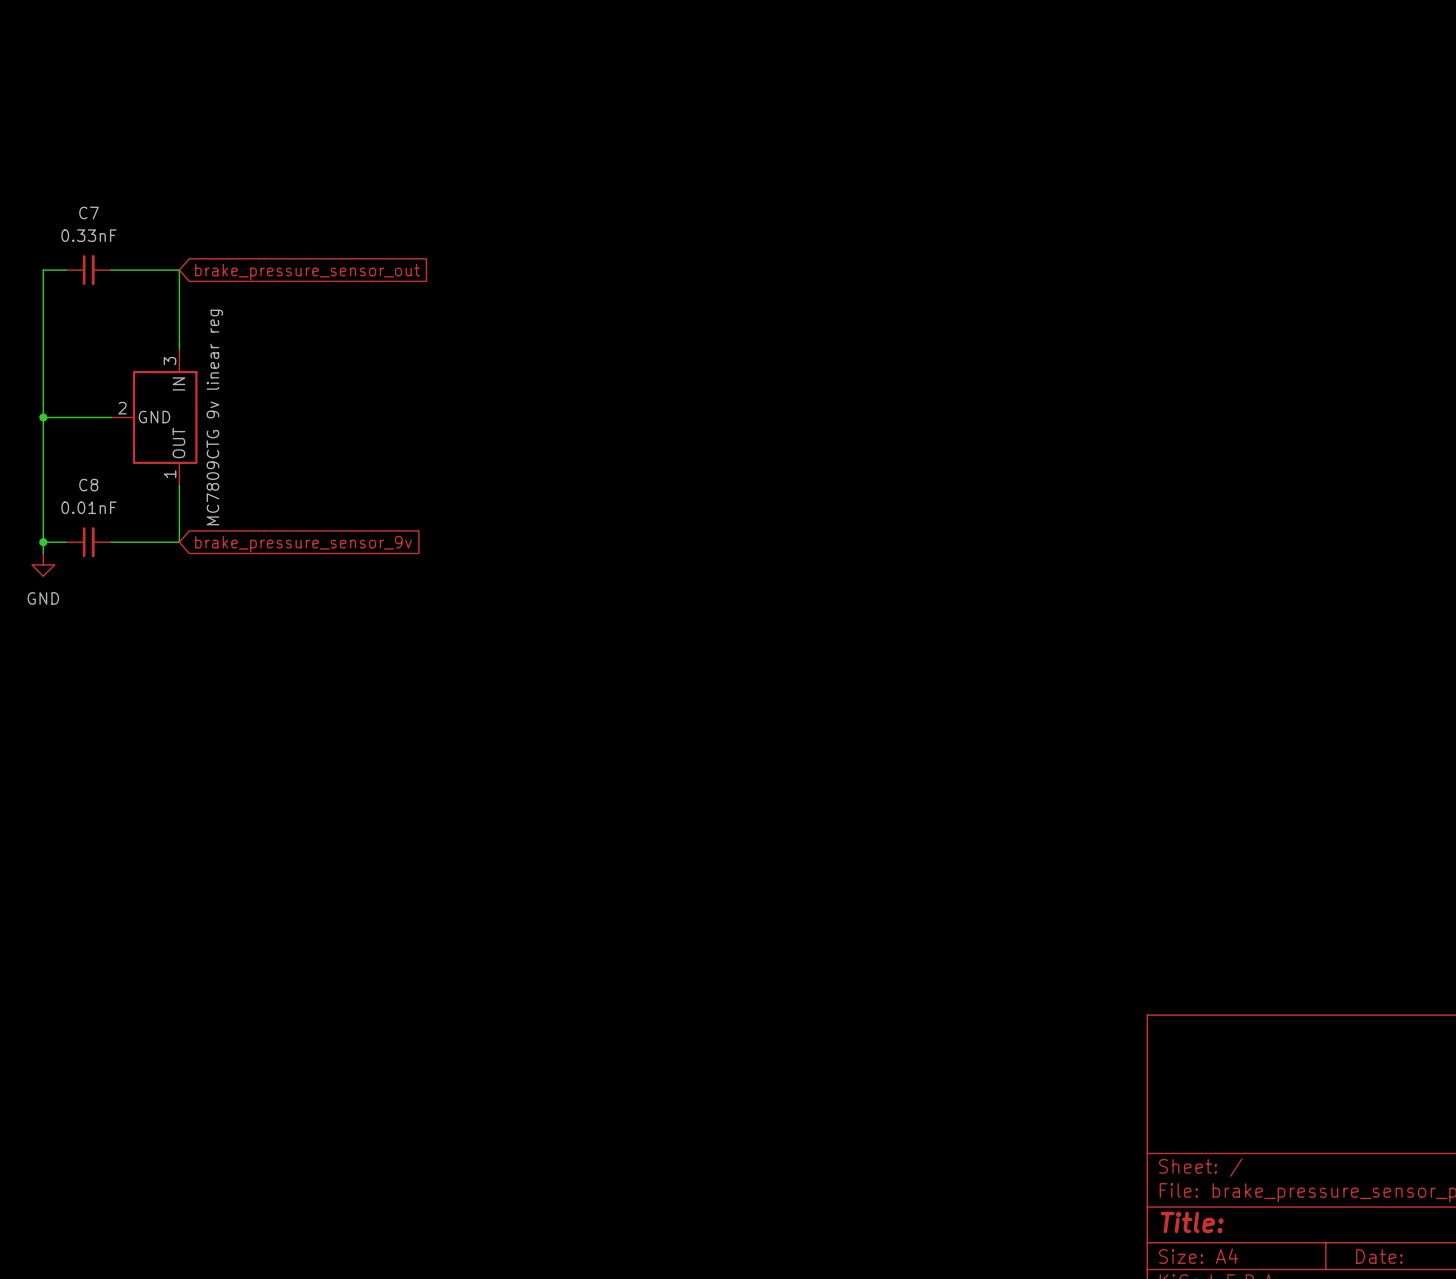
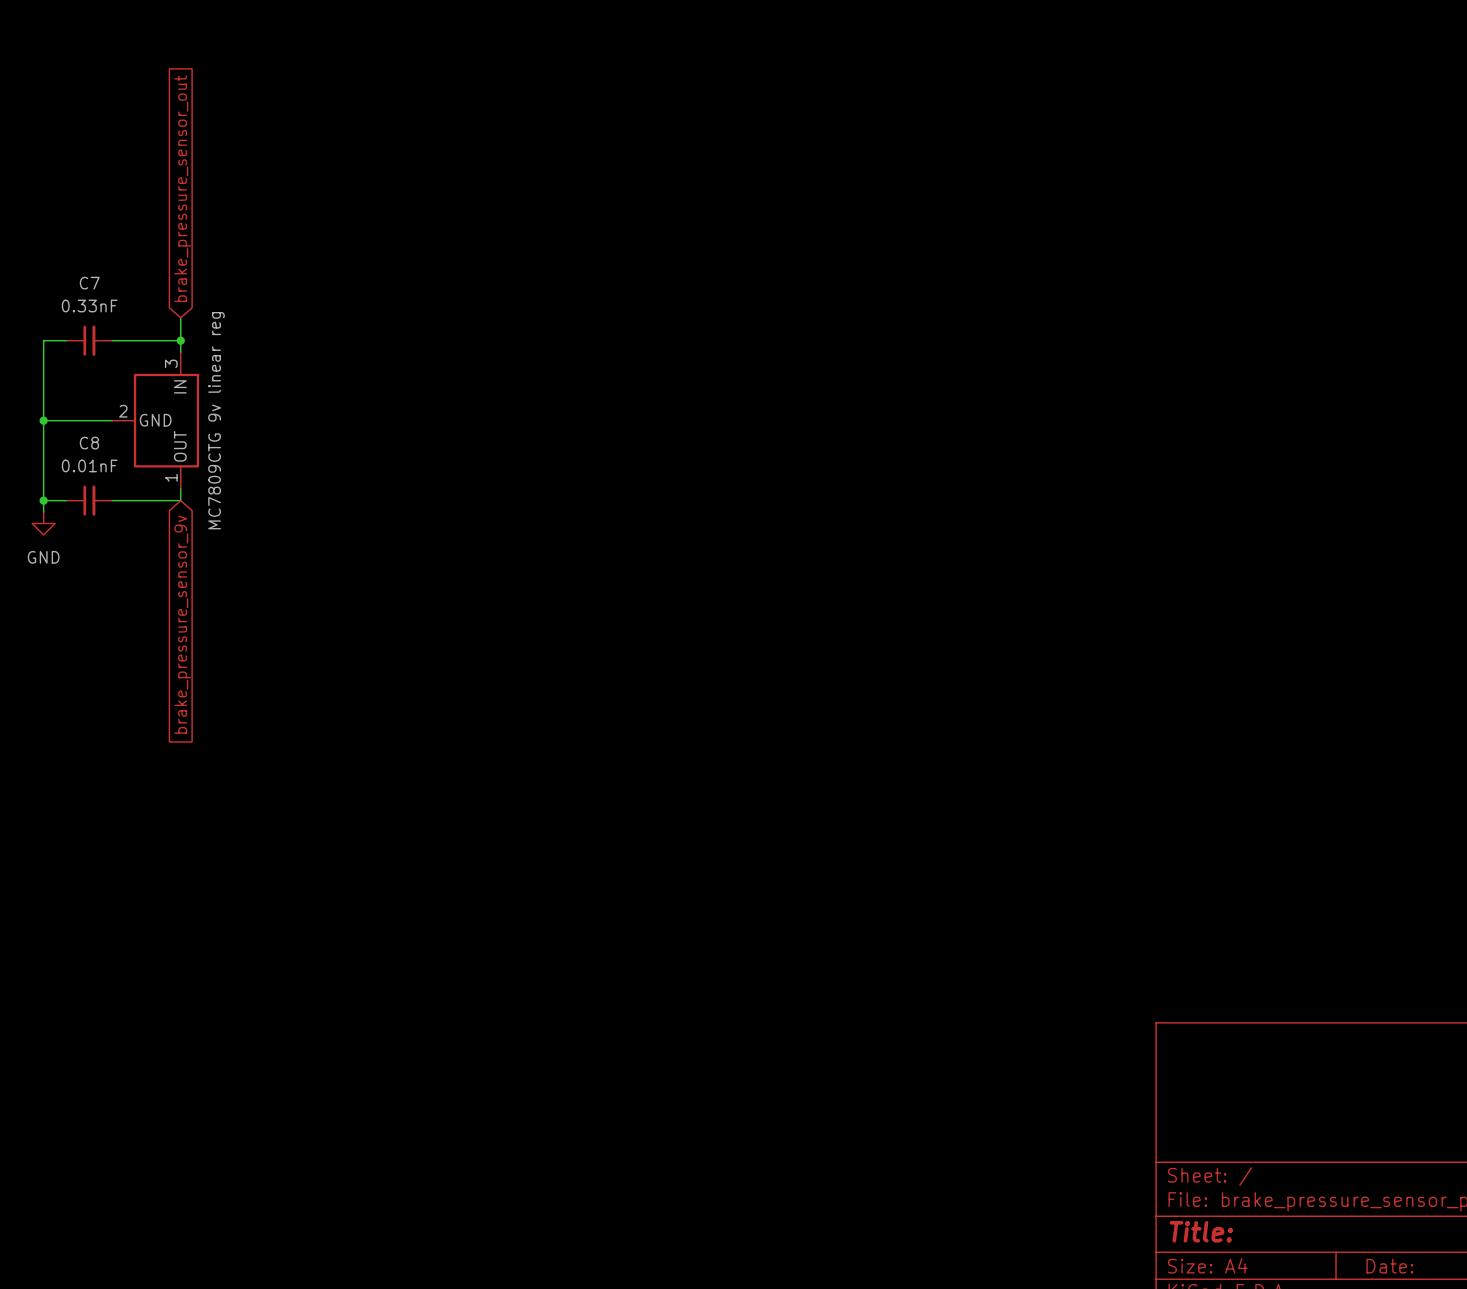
wire: (66, 270) (43, 270) (43, 338) -> (66, 340) (43, 340)
C7 position: (88, 270) -> (89, 340)
wire: (111, 270) (179, 270) (179, 315) -> none
global label rotation: 0° (307, 271) -> 90° counterclockwise (182, 188)
wire: none -> (112, 340) (180, 340)
junction: none -> (180, 340)
wire: (179, 496) (179, 542) (111, 542) -> (180, 500) (112, 500)
wire: (43, 508) (43, 553) -> none
wire: (43, 542) (66, 542) -> (43, 500) (66, 500)
junction position: (43, 542) -> (43, 500)
C8 position: (88, 542) -> (89, 500)
global label rotation: 0° (303, 544) -> 90° clockwise (182, 624)
power symbol position: GND (43, 564) -> GND (43, 523)

